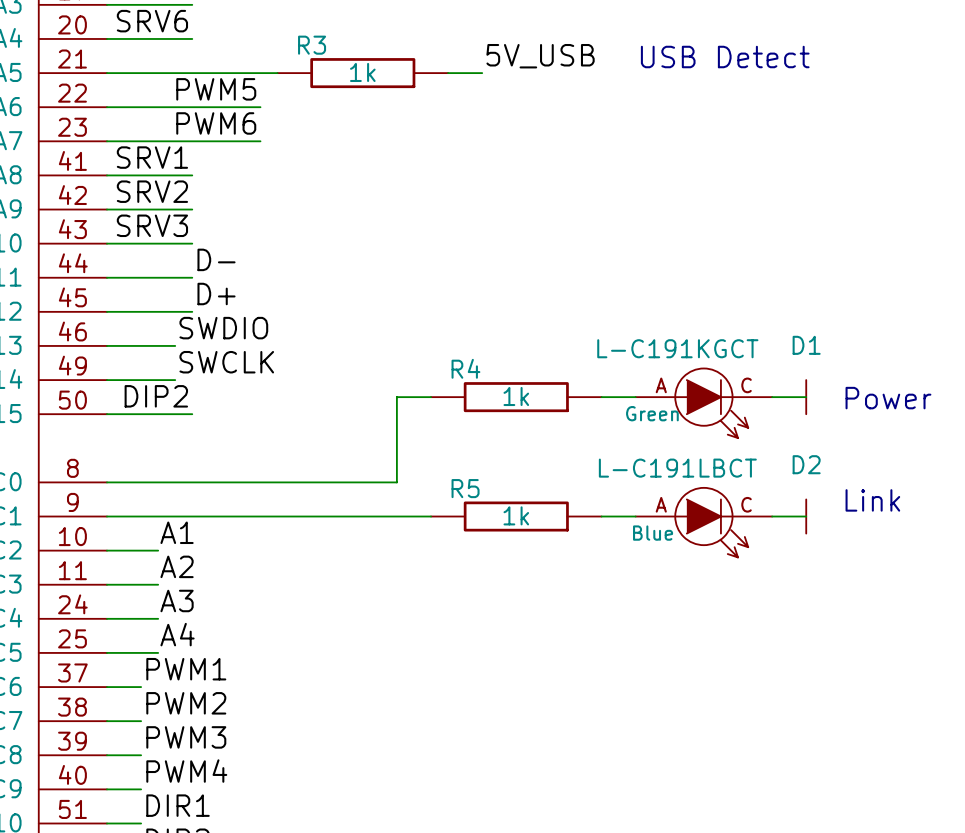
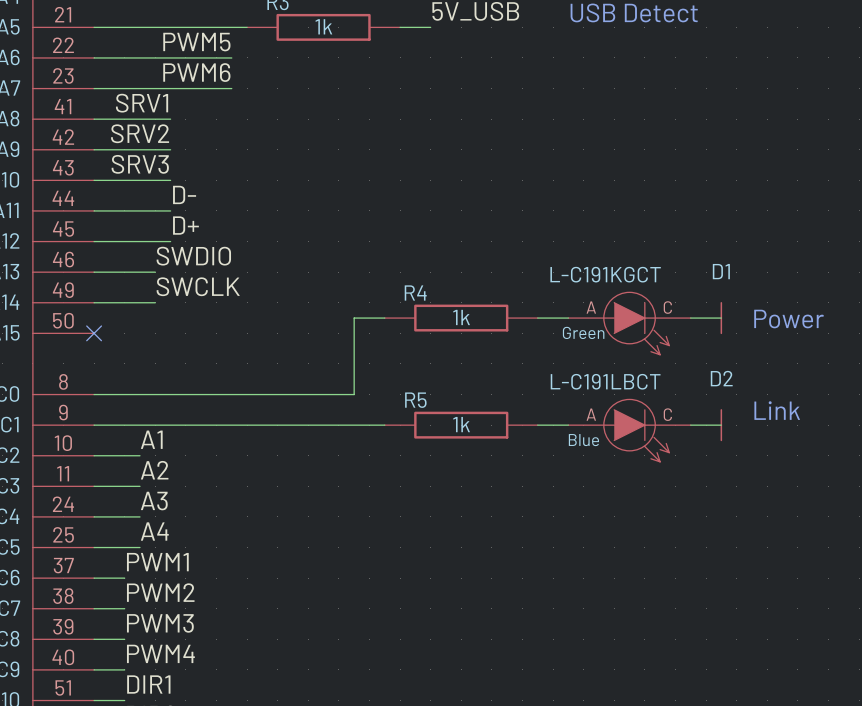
label: DIP2 (156, 396) -> none
wire: (106, 414) (192, 414) -> none
no-connect mark: none -> (94, 333)

